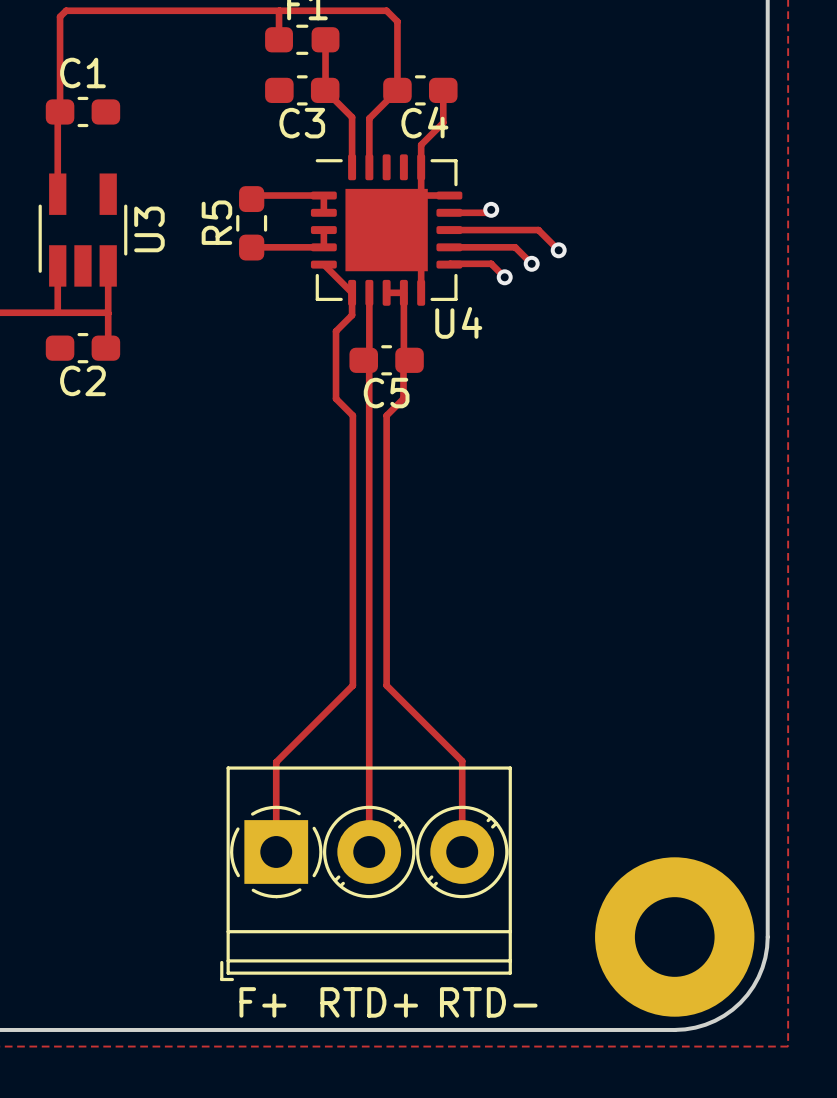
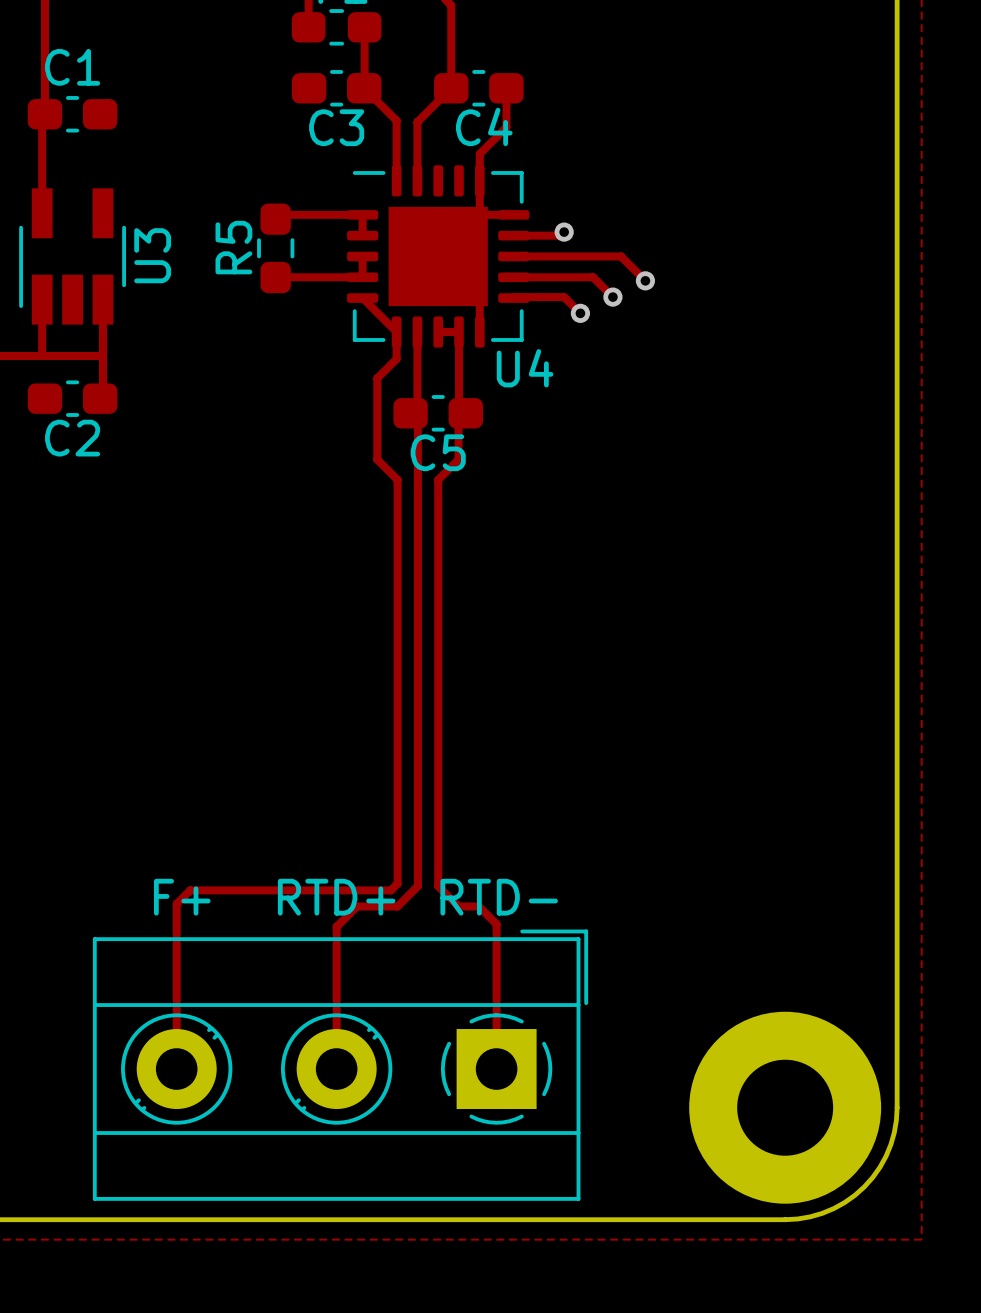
track: (369, 365) (369, 851) -> (417, 419) (417, 886) (397, 906) (356, 906) (336, 926) (336, 1069)
track: (352, 685) (276, 762) (276, 851) -> (397, 804) (397, 883) (390, 890) (190, 890) (176, 903) (176, 1069)
track: (386, 685) (462, 761) (462, 851) -> (438, 804) (438, 886) (458, 906) (478, 906) (496, 924) (496, 1069)
part: (366, 873) -> none
part: none -> (340, 1065)
text position: F+ (262, 1002) -> F+ (182, 897)
text position: RTD+ (369, 1002) -> RTD+ (336, 897)
text position: RTD- (488, 1002) -> RTD- (499, 897)

